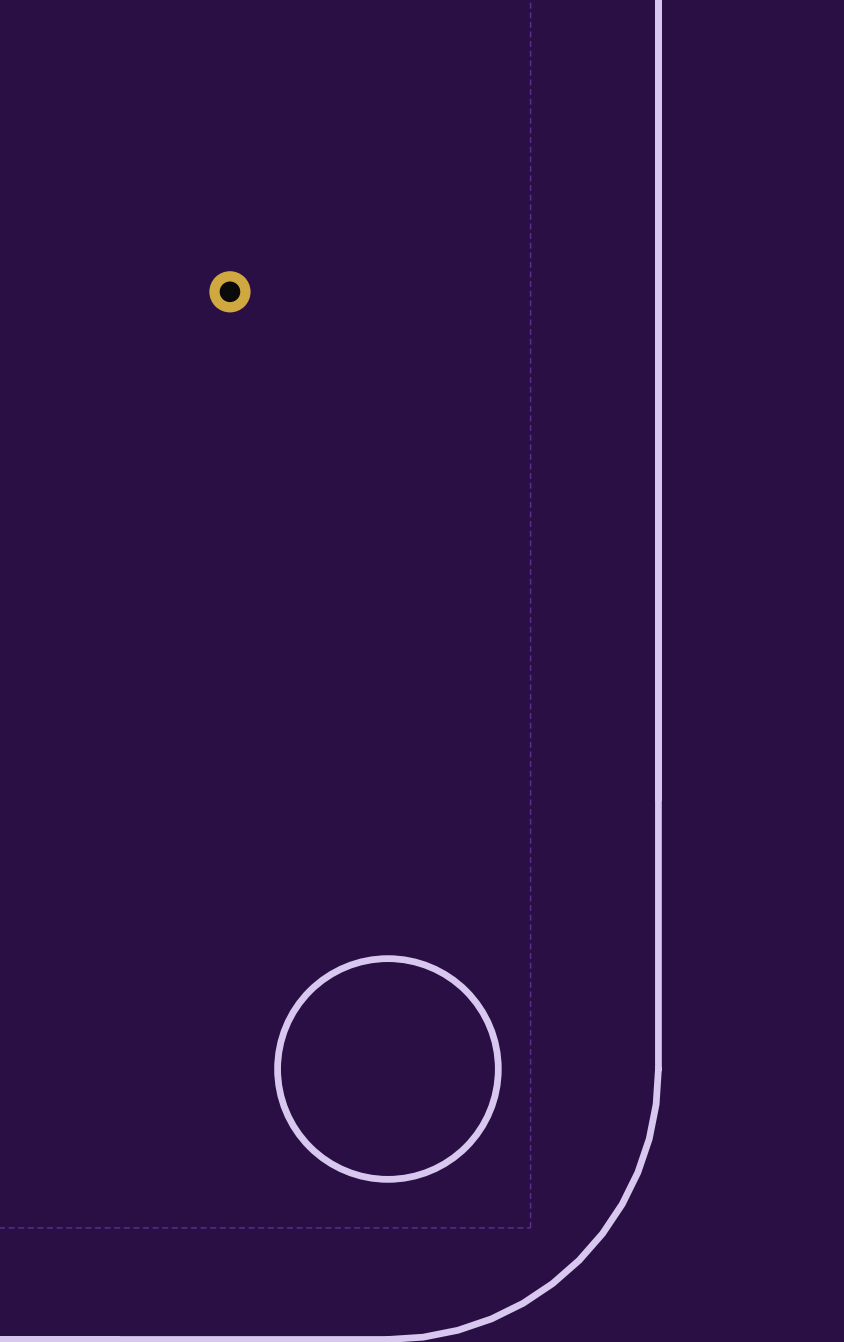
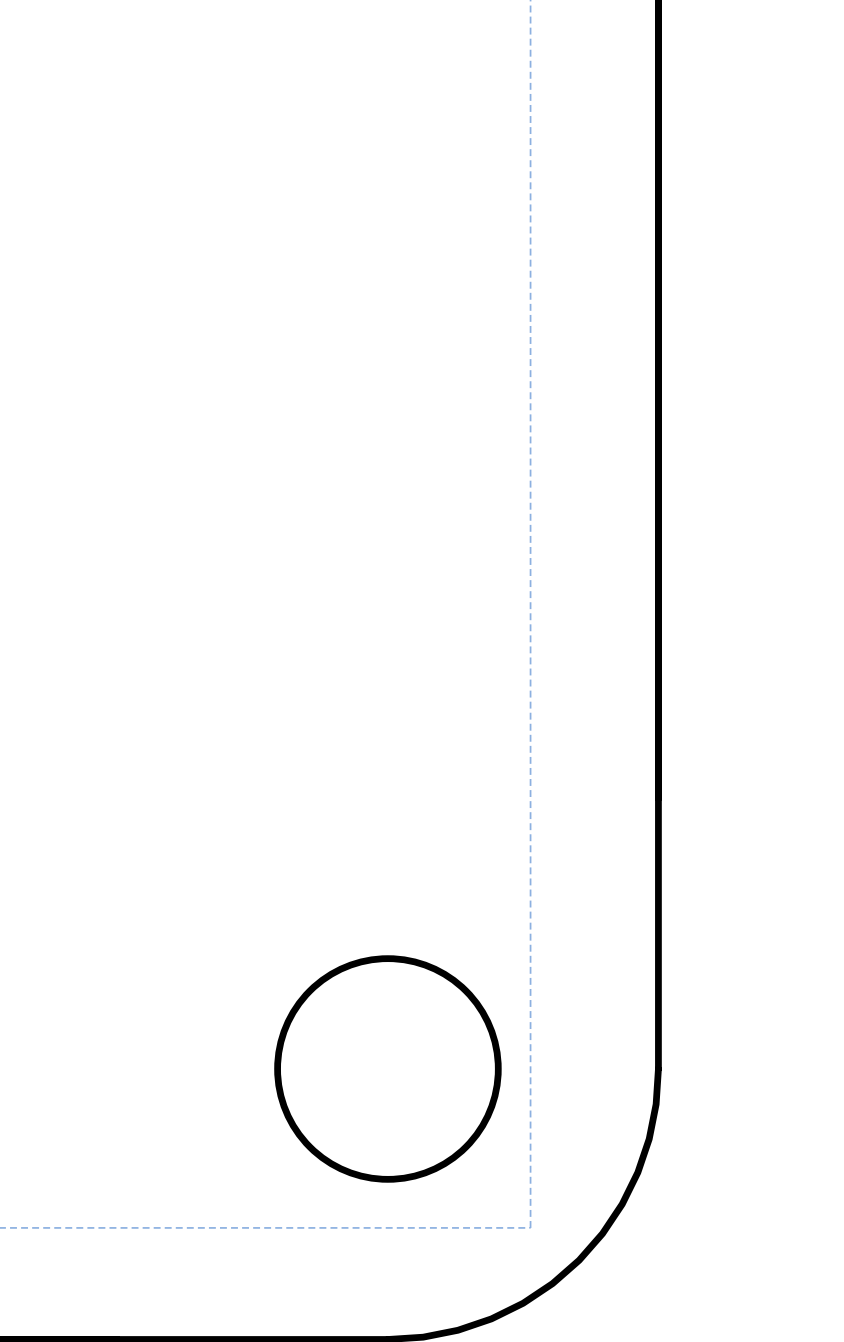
via: (229, 291) -> none

